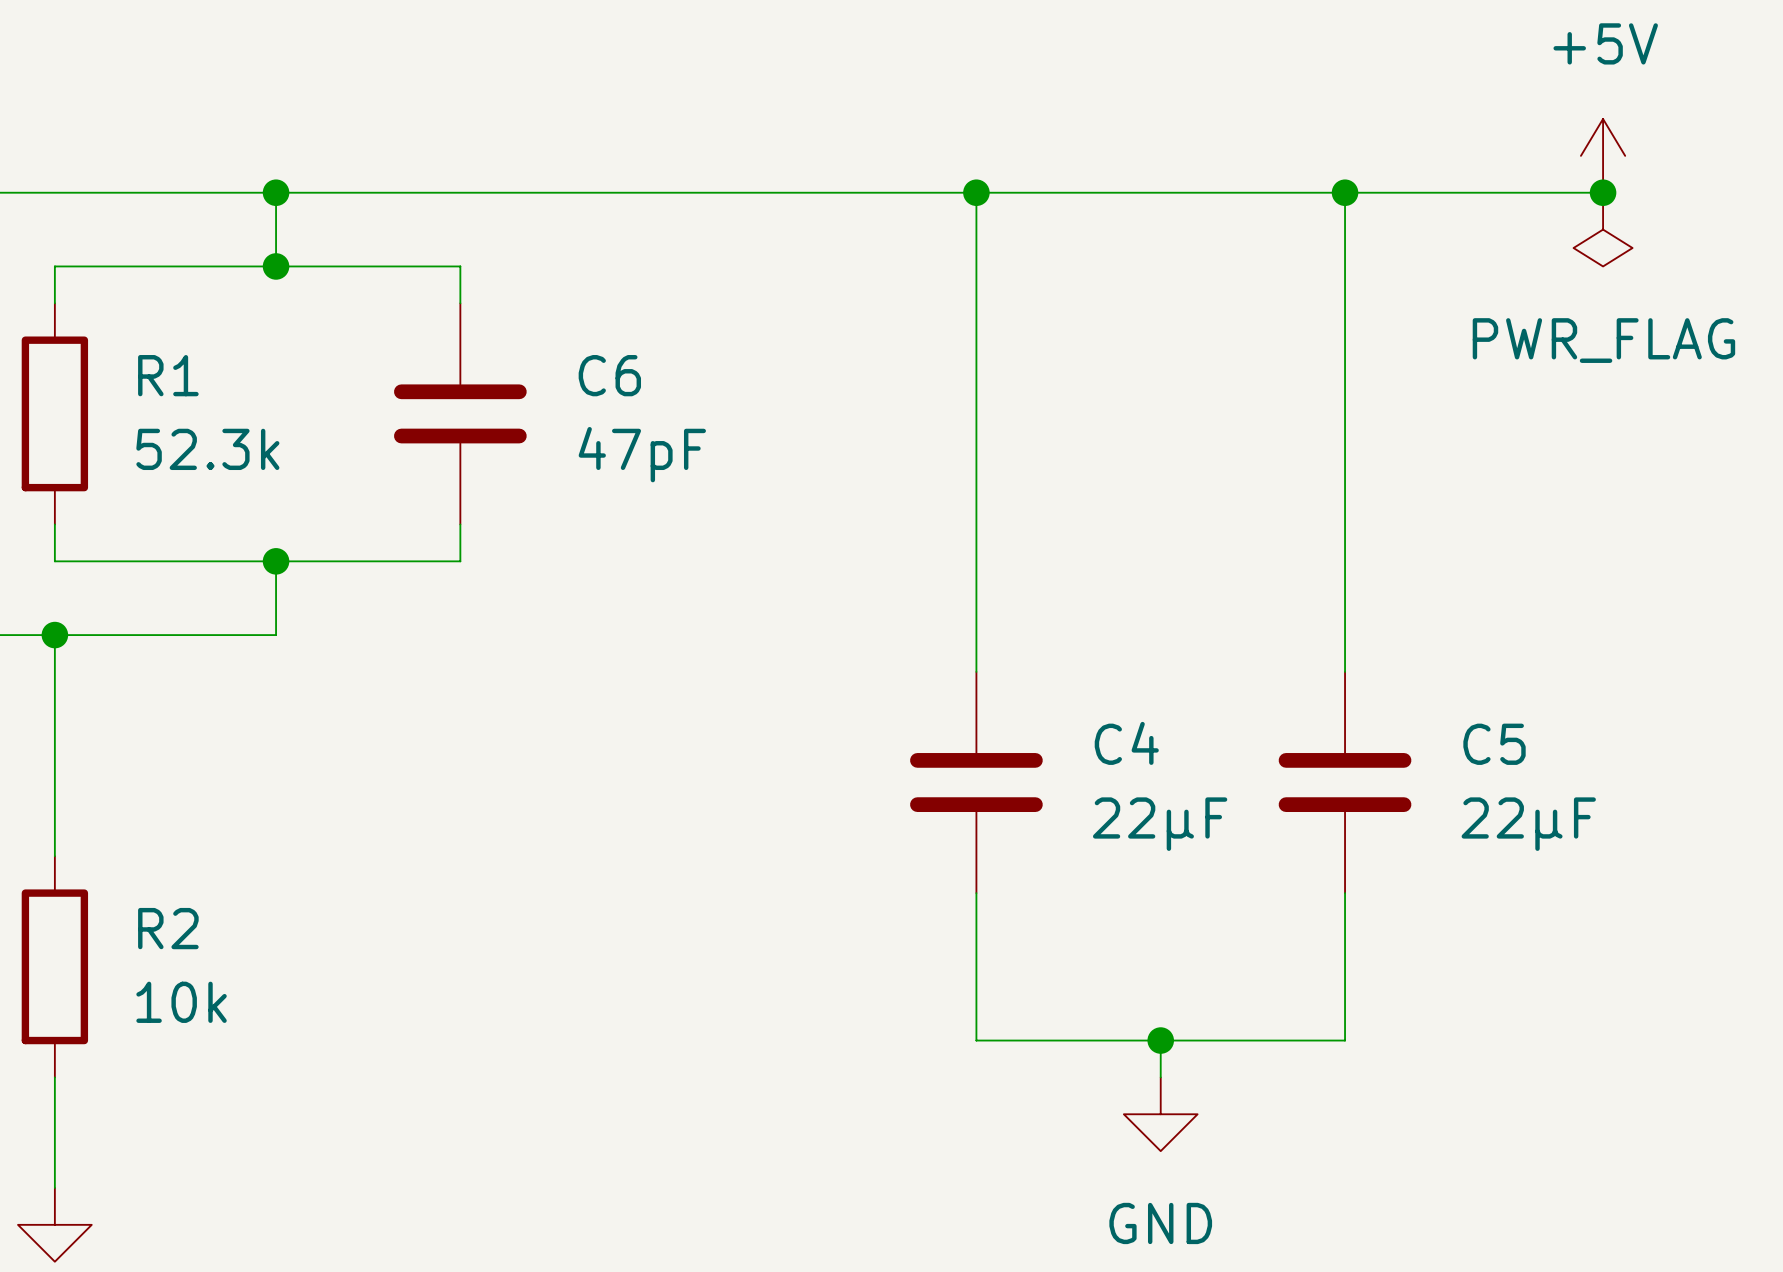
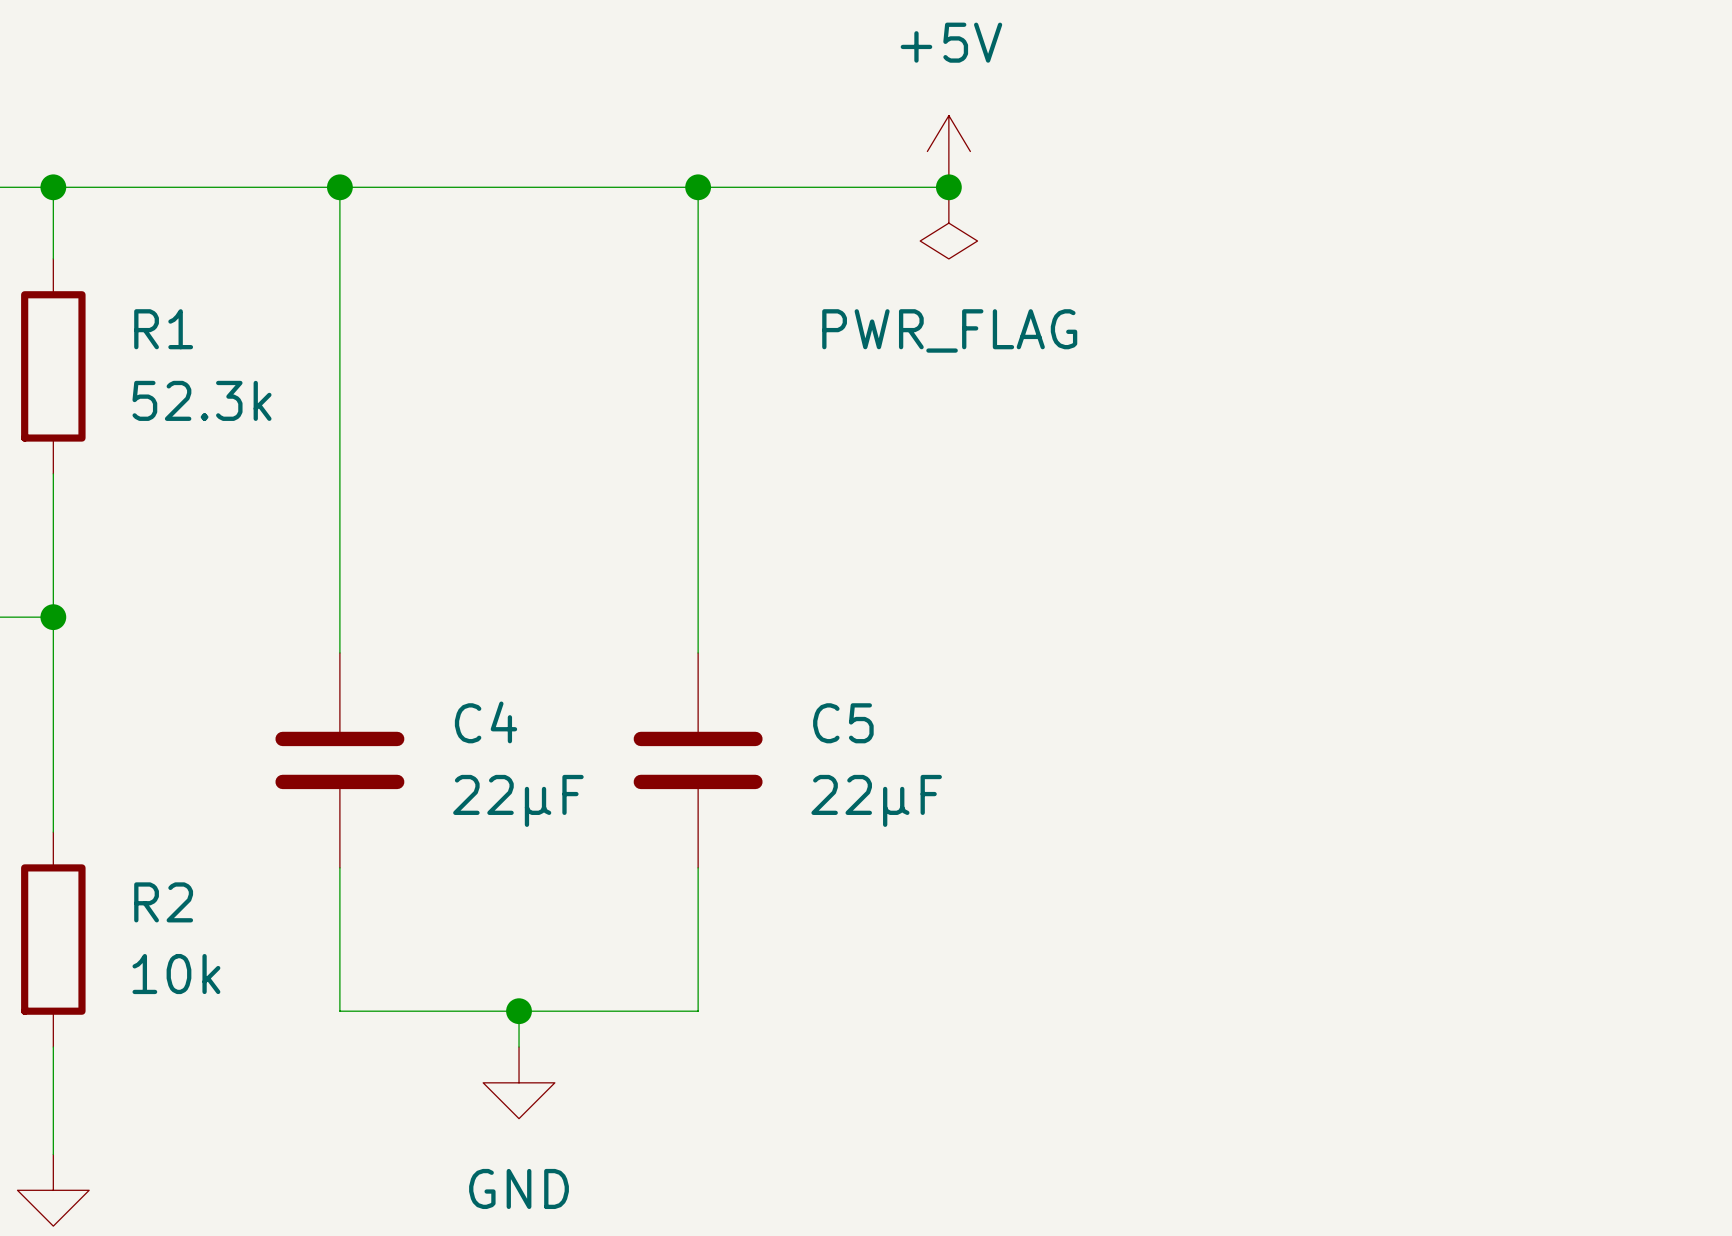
power symbol position: +5V (1603, 155) -> +5V (948, 151)
junction: none -> (53, 187)
wire: (276, 192) (276, 266) -> (53, 187) (53, 258)
junction: (276, 192) -> none
wire: none -> (339, 187) (339, 652)
junction: none -> (339, 187)
junction: none -> (698, 187)
wire: (1345, 192) (1345, 671) -> (698, 187) (698, 652)
junction: (1345, 192) -> none
wire: (1603, 192) (976, 192) (976, 671) -> none
junction: (1603, 192) -> none
power symbol position: PWR_FLAG (1603, 229) -> PWR_FLAG (948, 223)
junction: (276, 266) -> none
wire: (54, 303) (54, 266) (460, 266) (460, 303) -> none
R1 position: (54, 413) -> (53, 366)
C6: 47pF (460, 413) -> none
wire: (460, 524) (460, 561) (54, 561) -> none
wire: (276, 561) (276, 635) (54, 635) -> (53, 545) (53, 617)
junction: (276, 561) -> none
C4 position: (976, 782) -> (339, 760)
C5 position: (1345, 782) -> (698, 760)
wire: (976, 893) (976, 1040) (1345, 1040) (1345, 893) -> (339, 867) (339, 1011) (698, 1011) (698, 867)
junction: none -> (519, 1011)
wire: (1160, 1040) (1160, 1077) -> (519, 1011) (519, 1047)
junction: (1160, 1040) -> none
power symbol position: GND (1160, 1114) -> GND (519, 1082)

